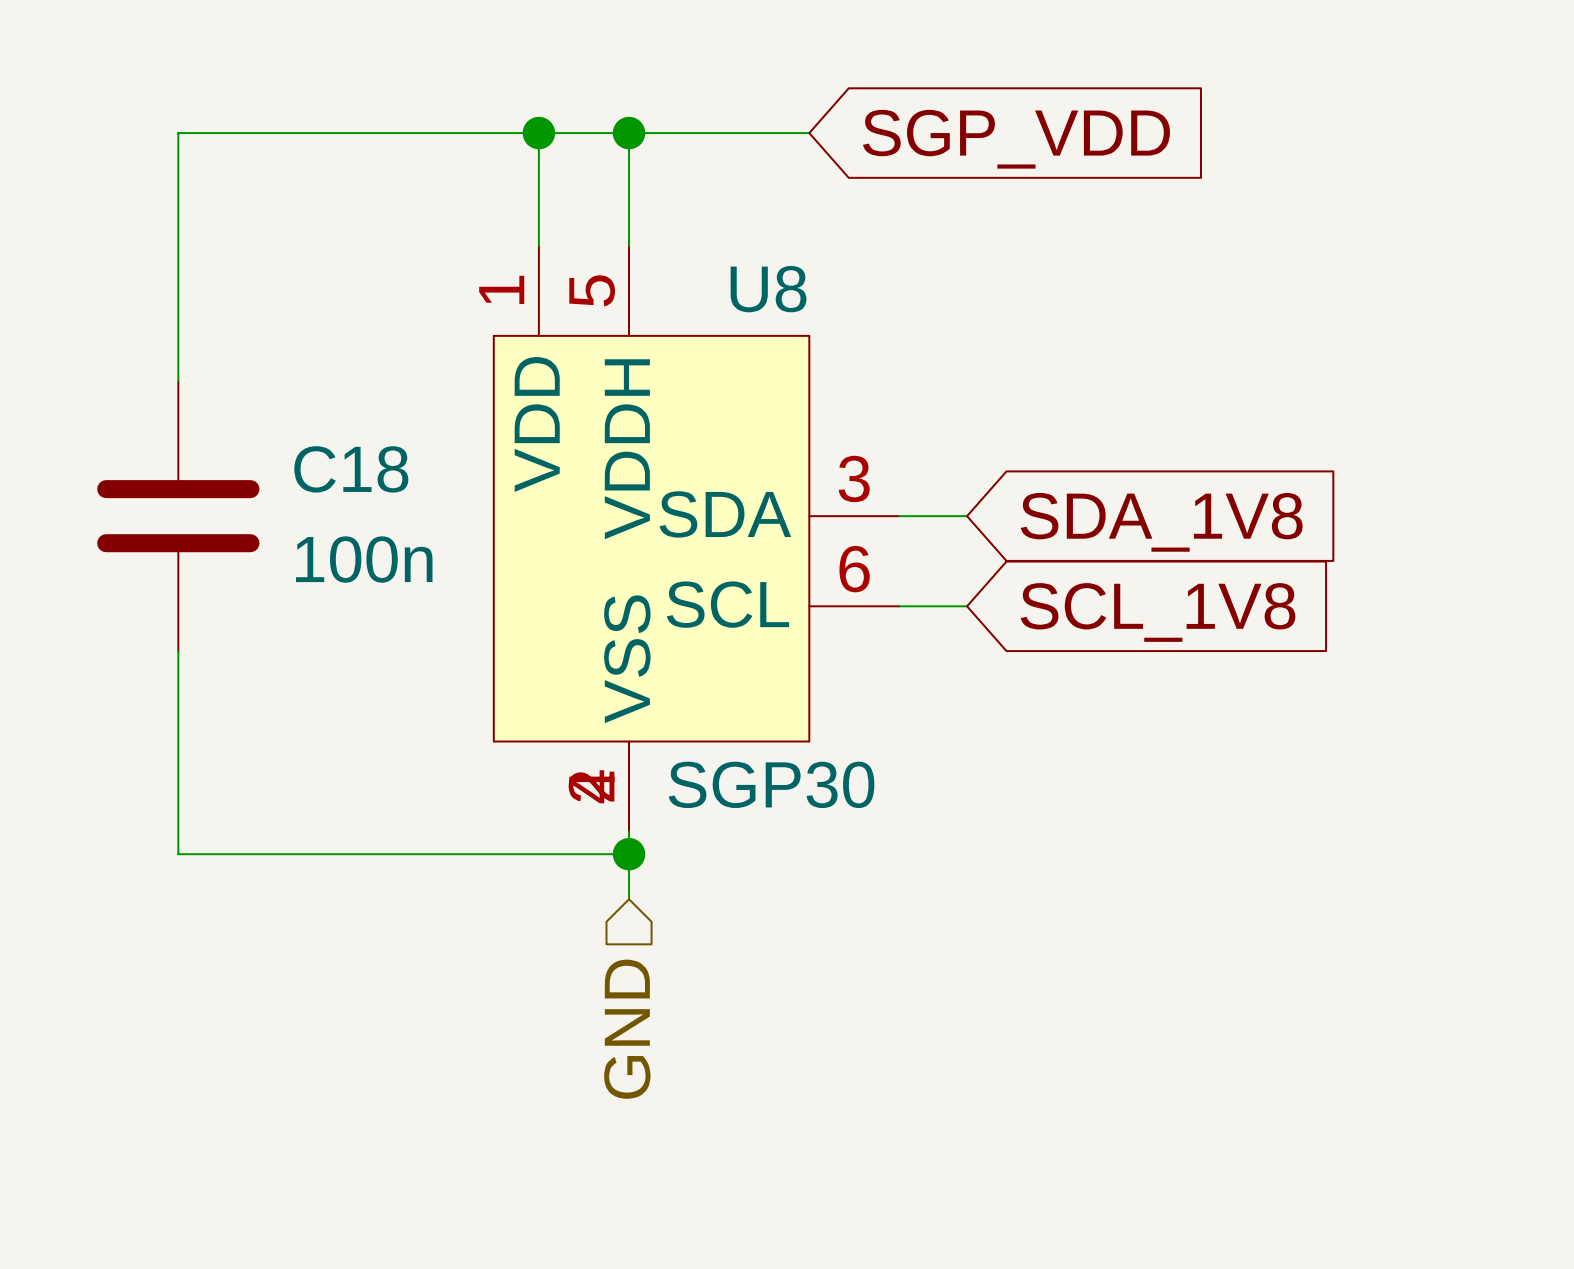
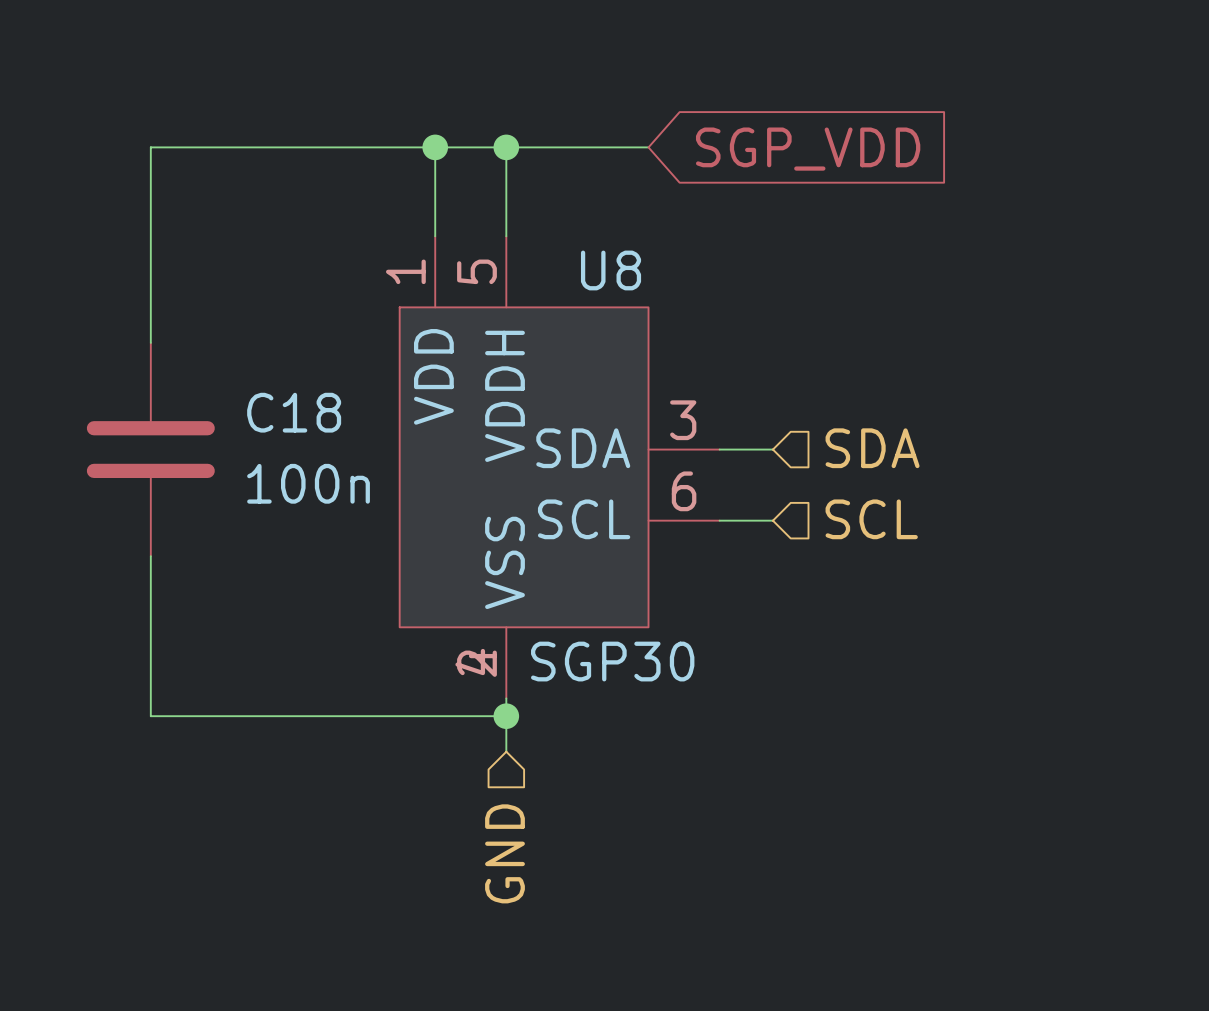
hierarchical label: none -> SDA (872, 448)
global label: SDA_1V8 (1161, 522) -> none
hierarchical label: none -> SCL (871, 519)
global label: SCL_1V8 (1158, 612) -> none

